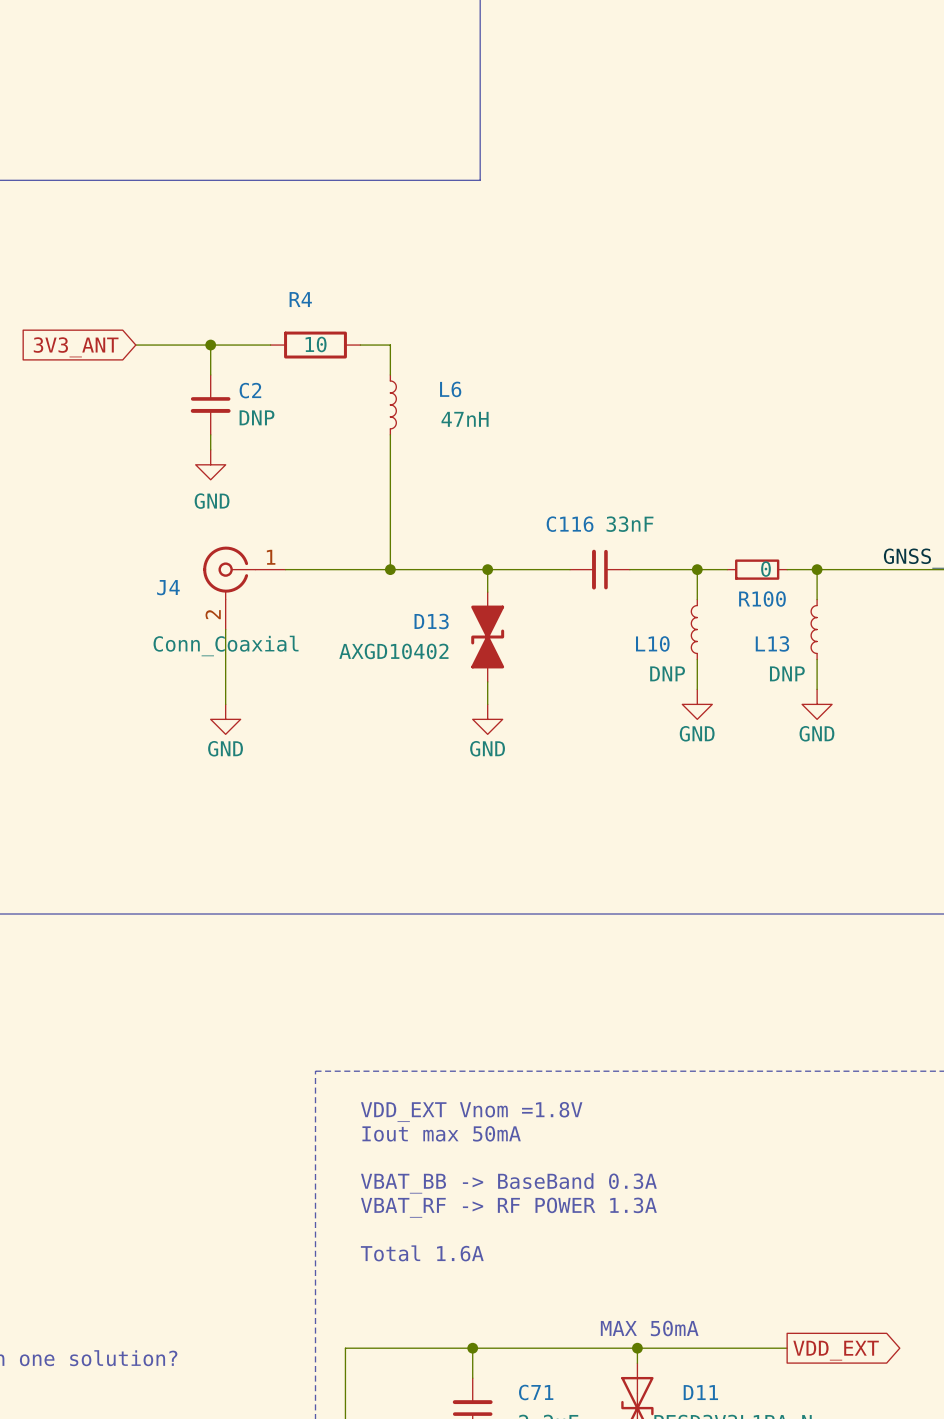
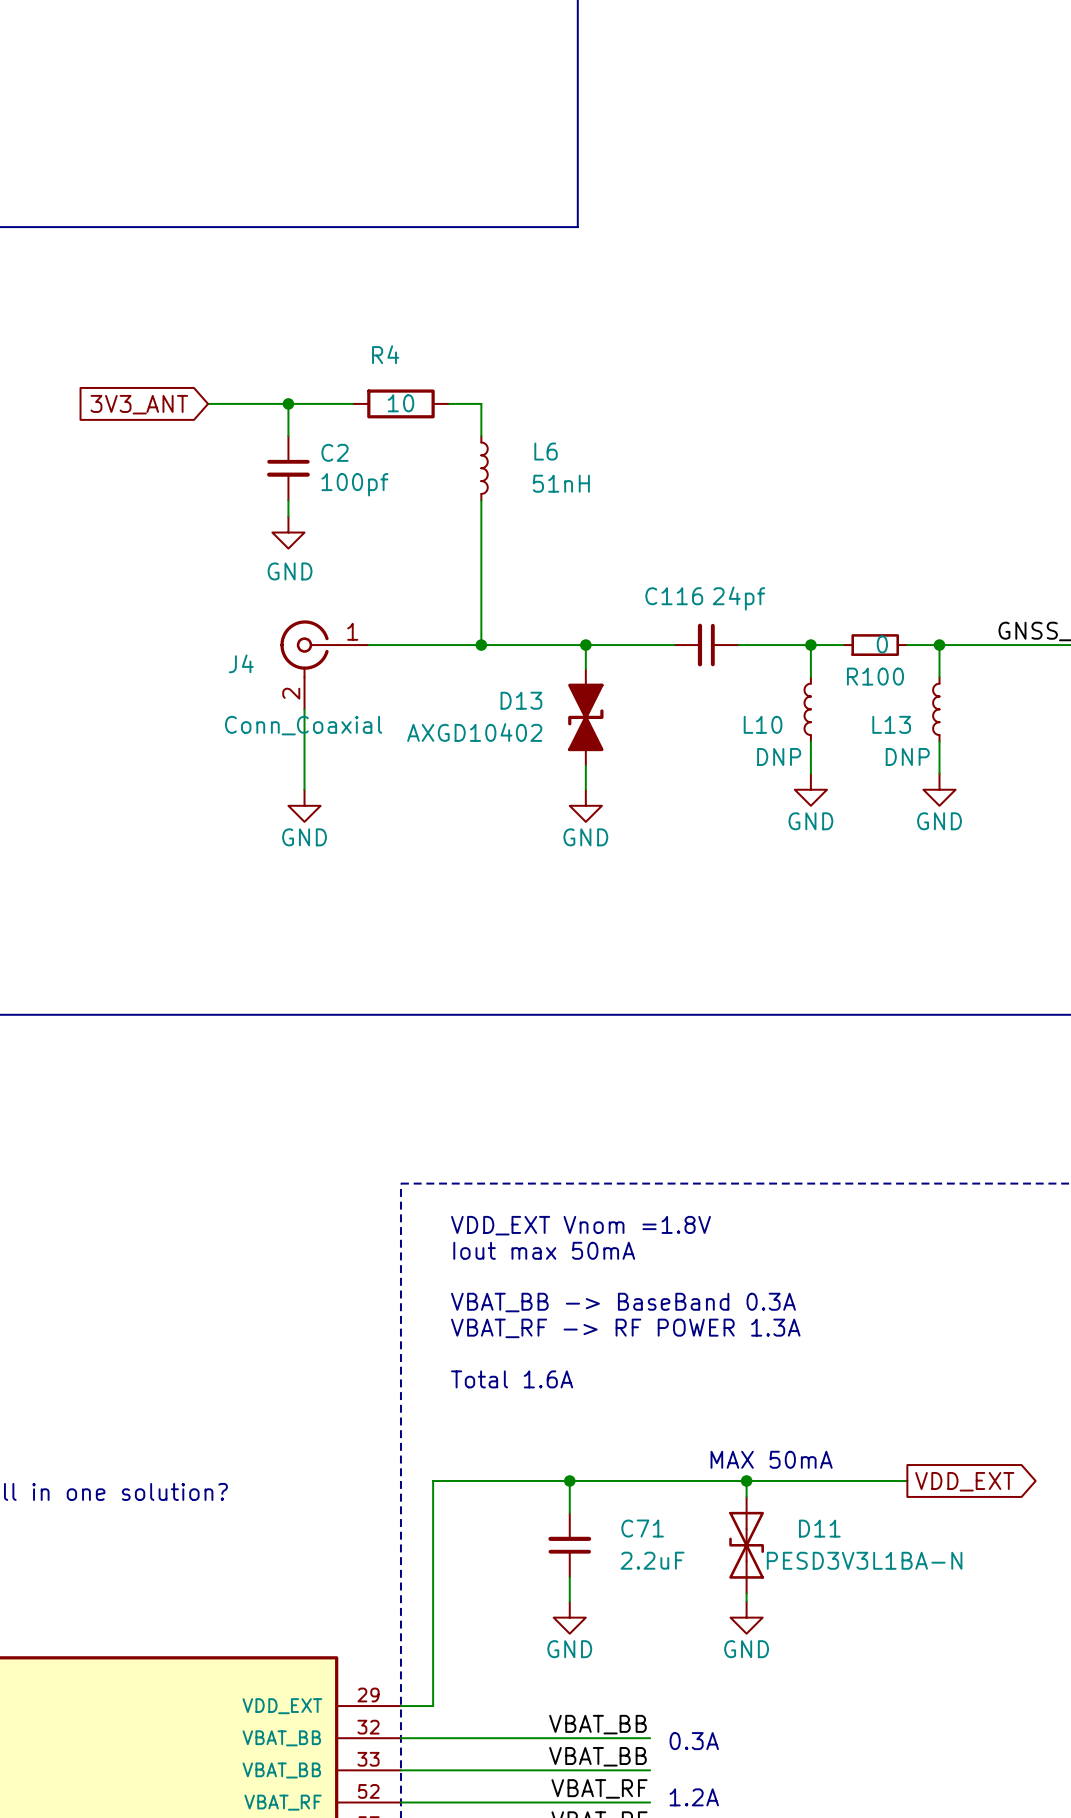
C2 value: DNP (257, 417) -> 100pf (354, 484)
L6 value: 47nH (465, 419) -> 51nH (561, 483)
C116 value: 33nF (630, 524) -> 24pf (738, 598)

